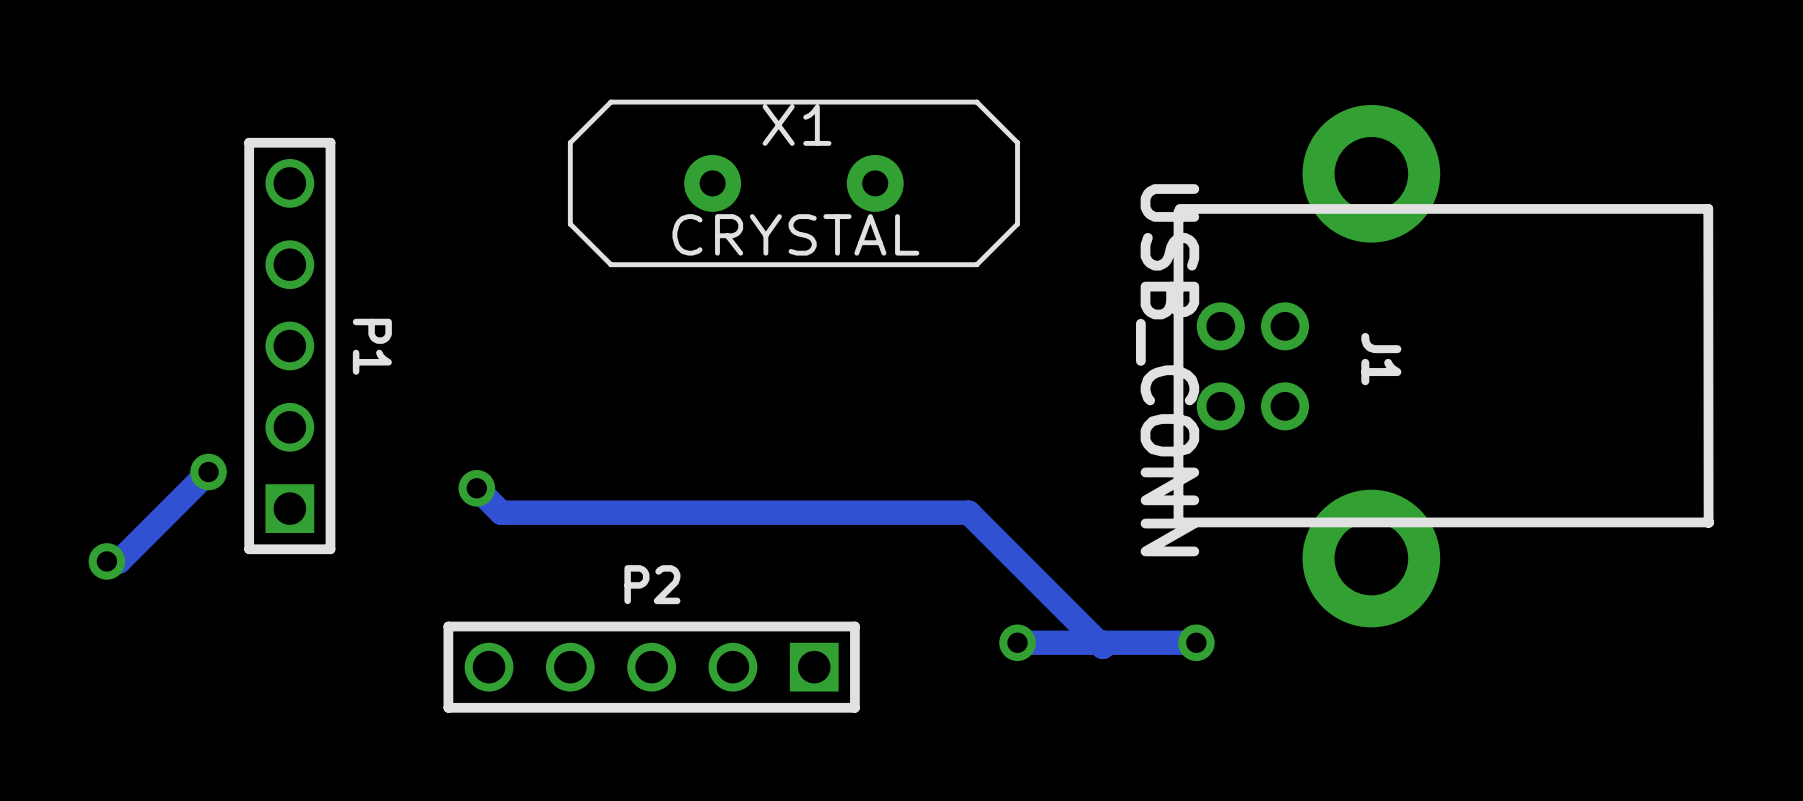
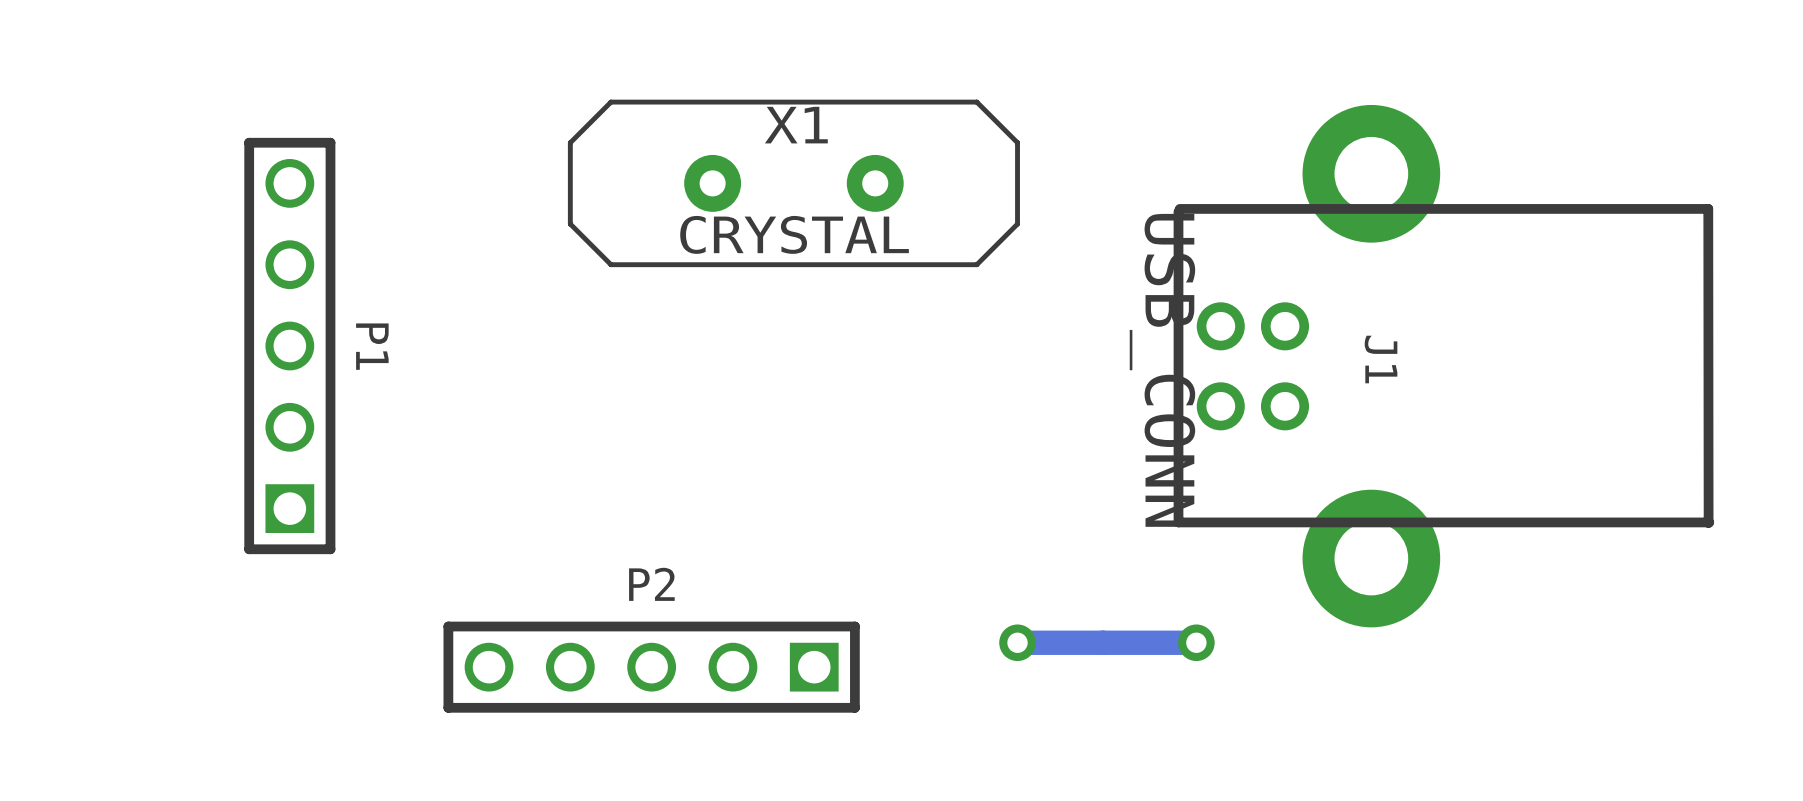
track: (208, 472) (119, 561) (106, 561) -> none
via: (208, 472) -> none
track: (476, 488) (501, 512) (968, 512) (1102, 646) (1102, 642) -> none
via: (476, 488) -> none
via: (106, 561) -> none

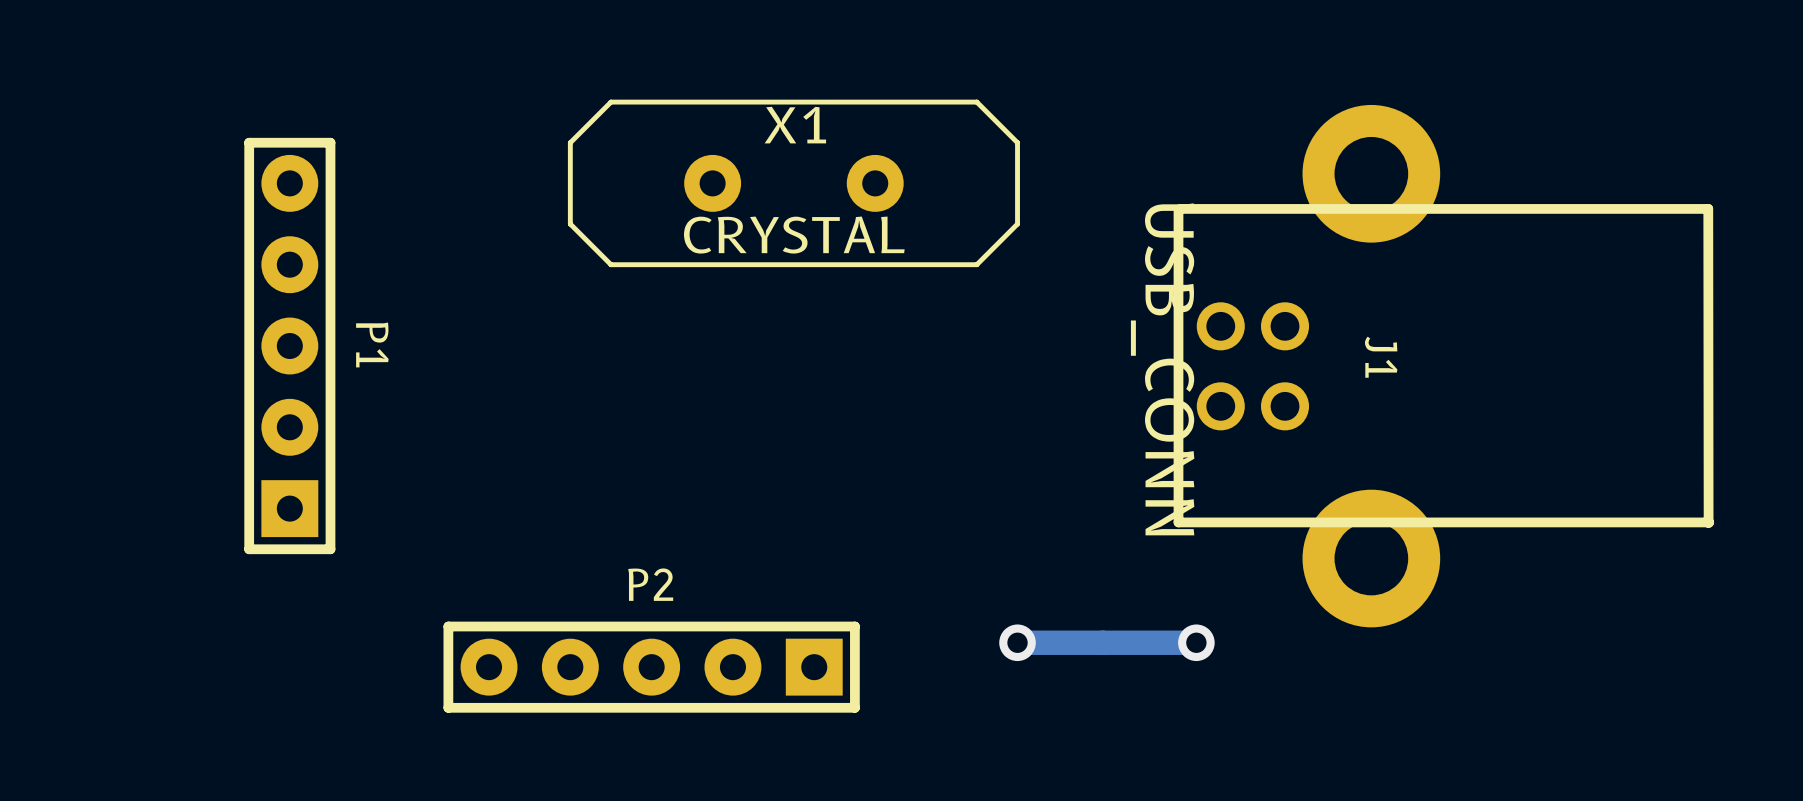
P1 footprint: [244, 137, 336, 555] -> [244, 137, 336, 555]
P2 footprint: [443, 621, 860, 713] -> [443, 621, 860, 713]

